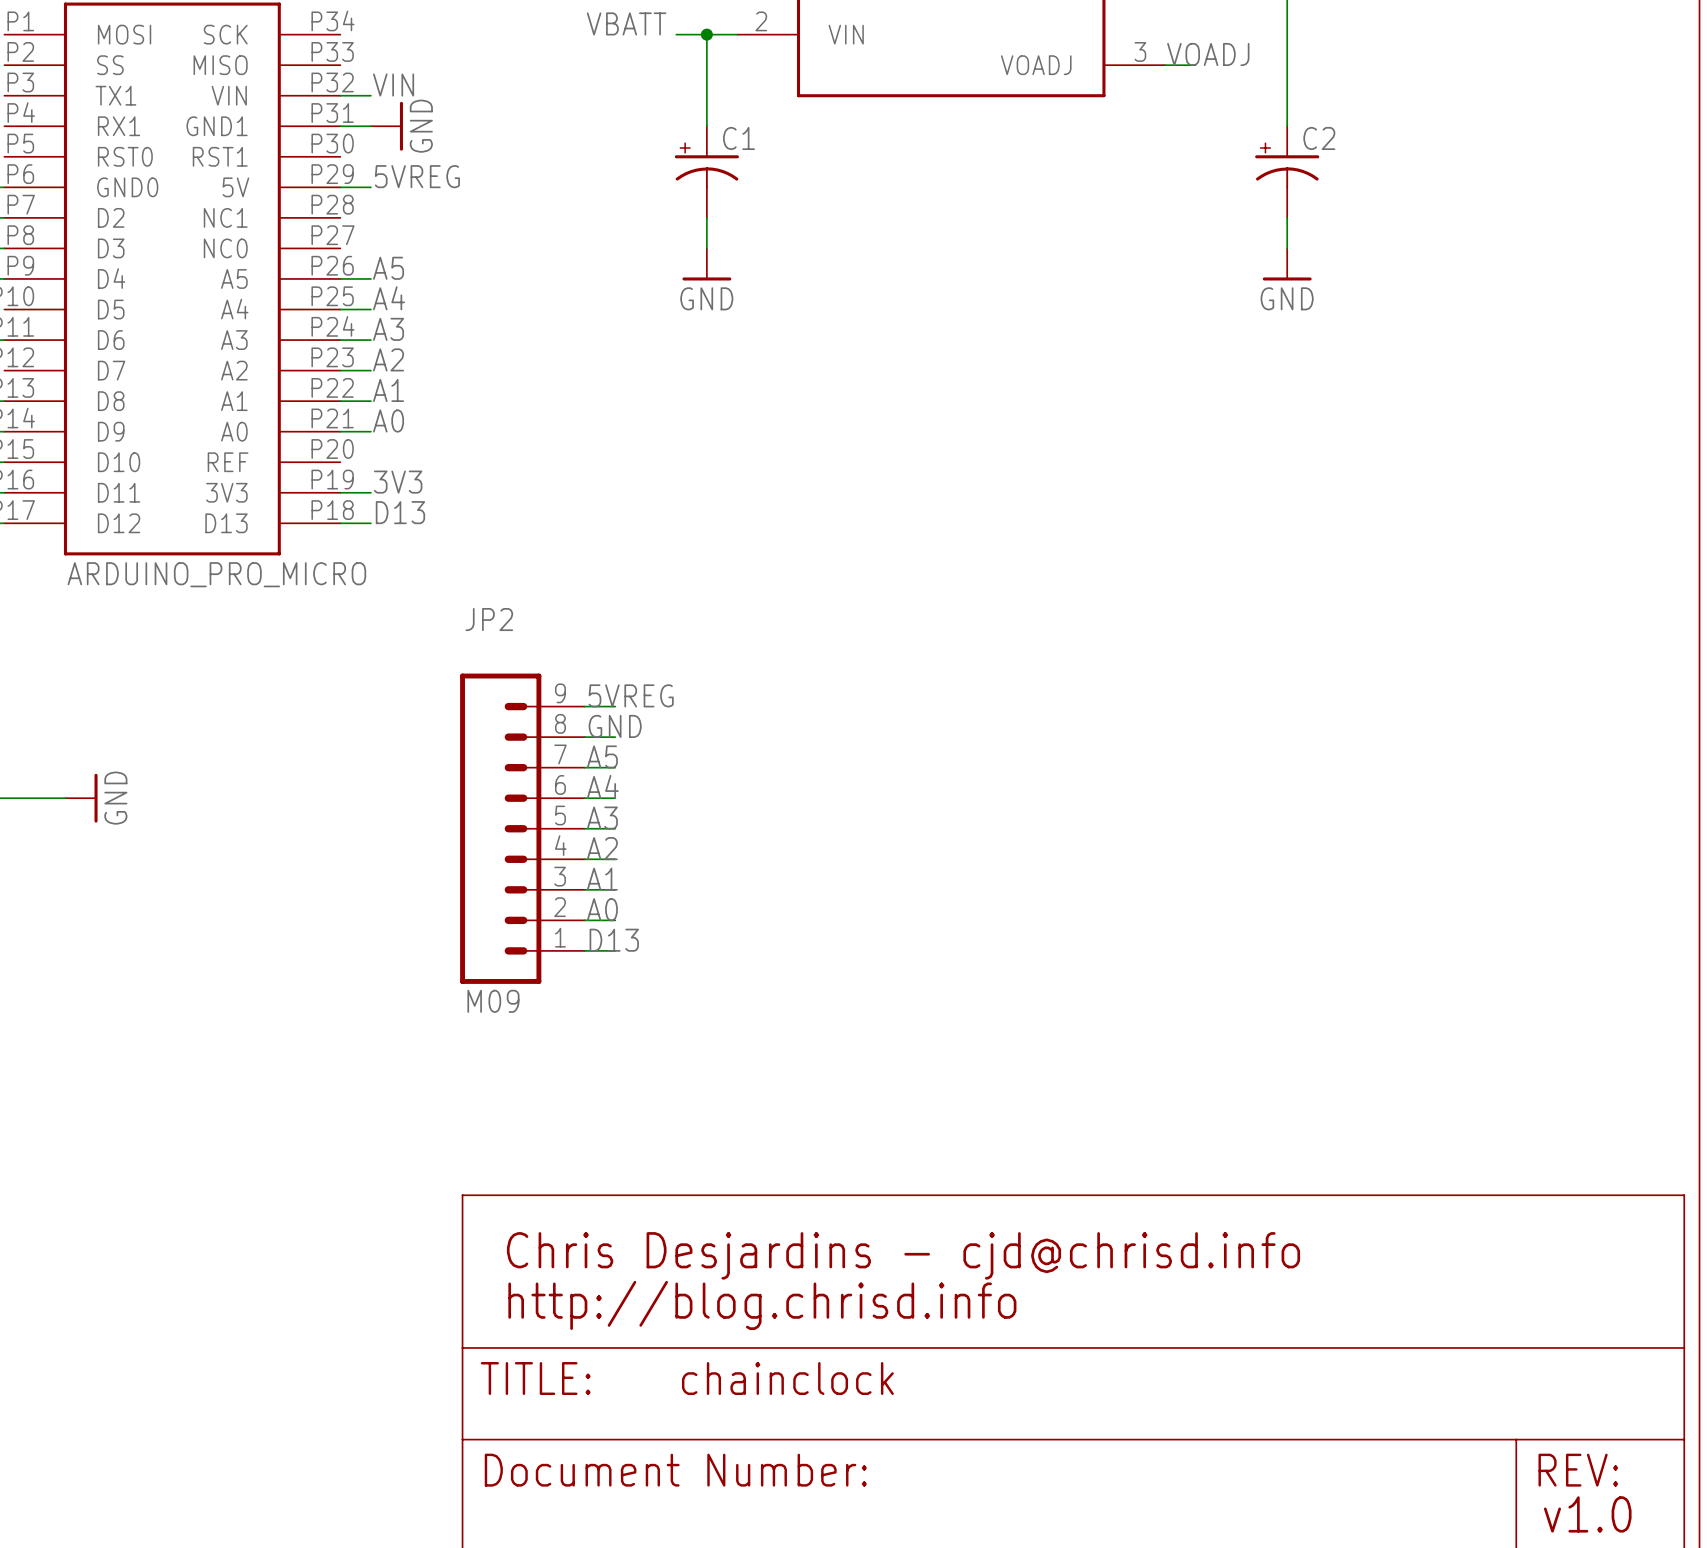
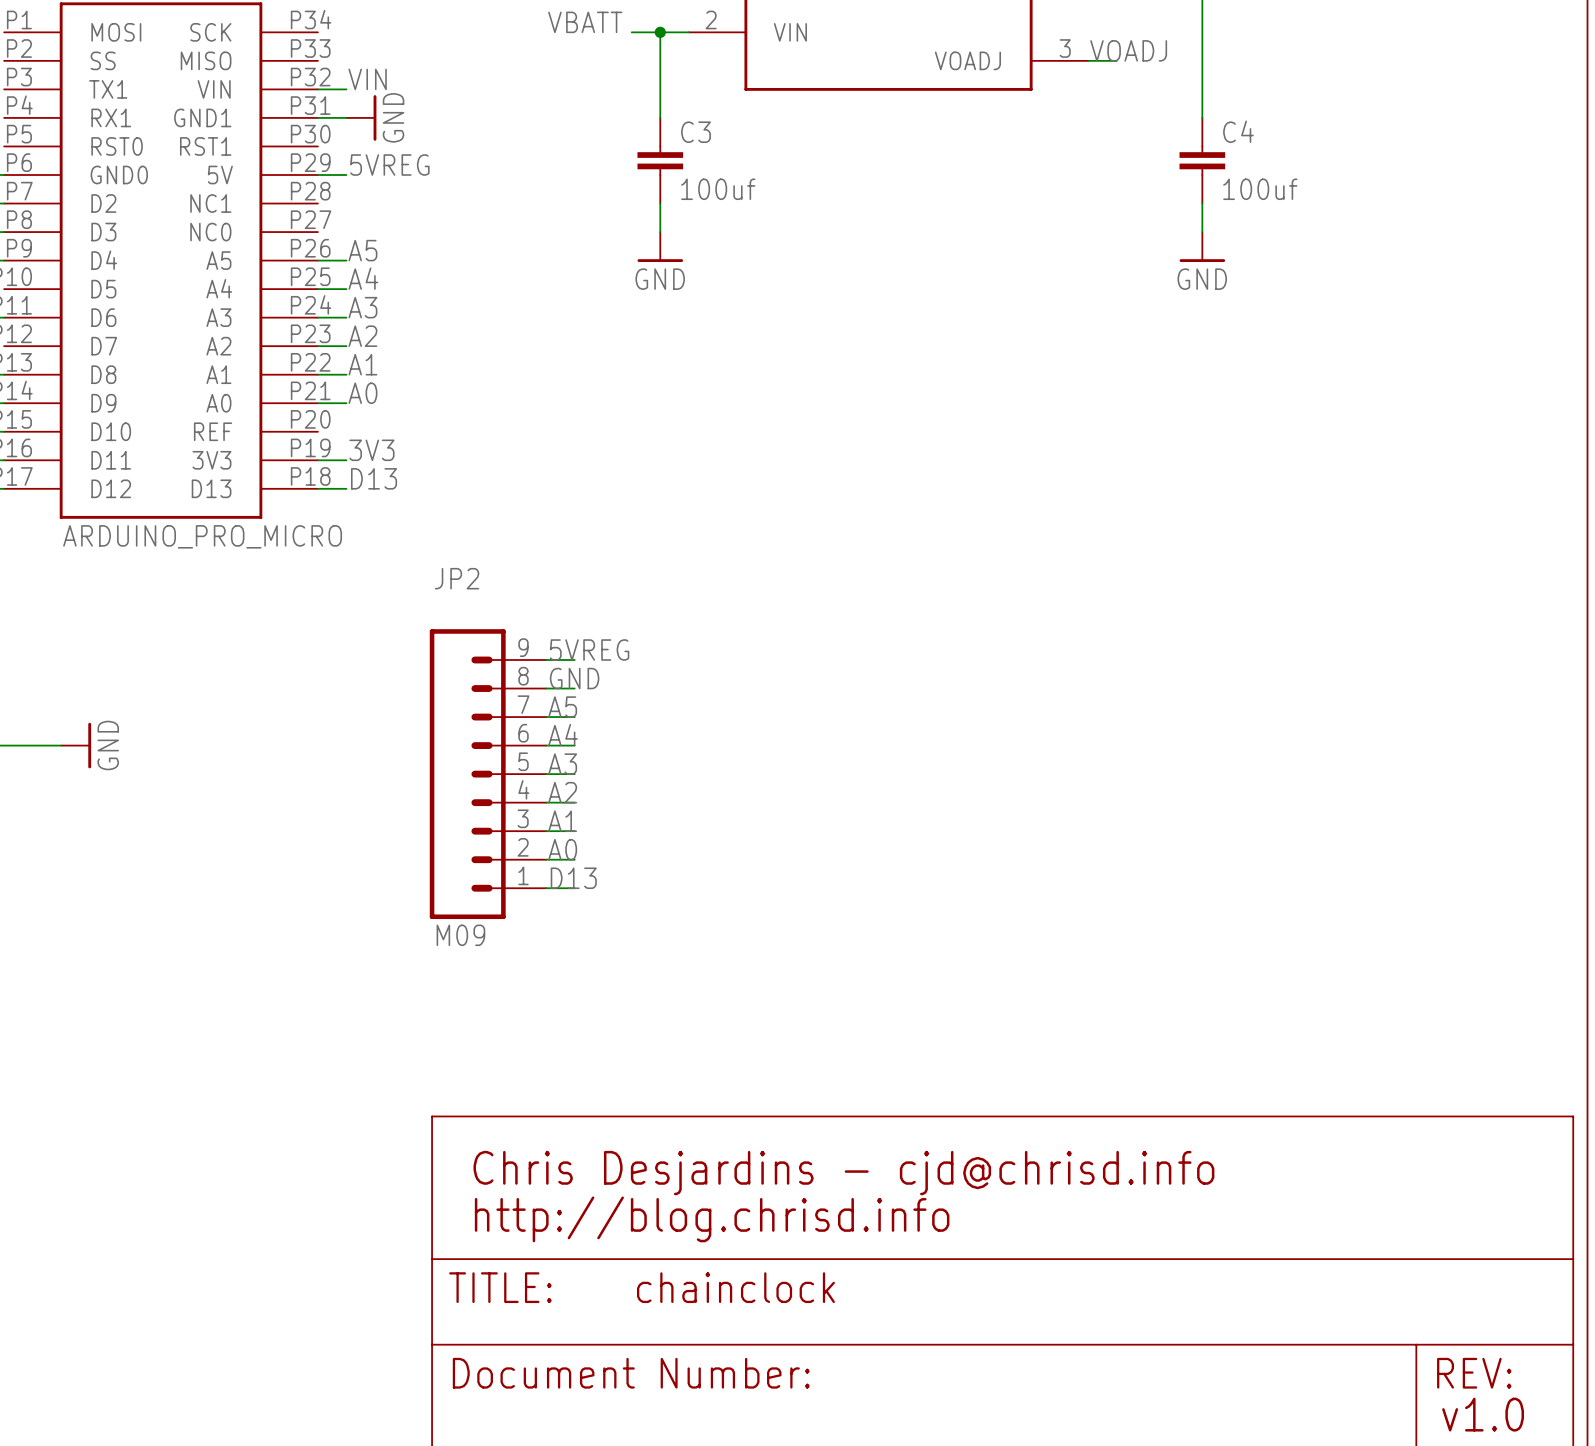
C1: (706, 172) -> none
C3: none -> 100uf (660, 160)
C2: (1287, 172) -> none
C4: none -> 100uf (1202, 160)

